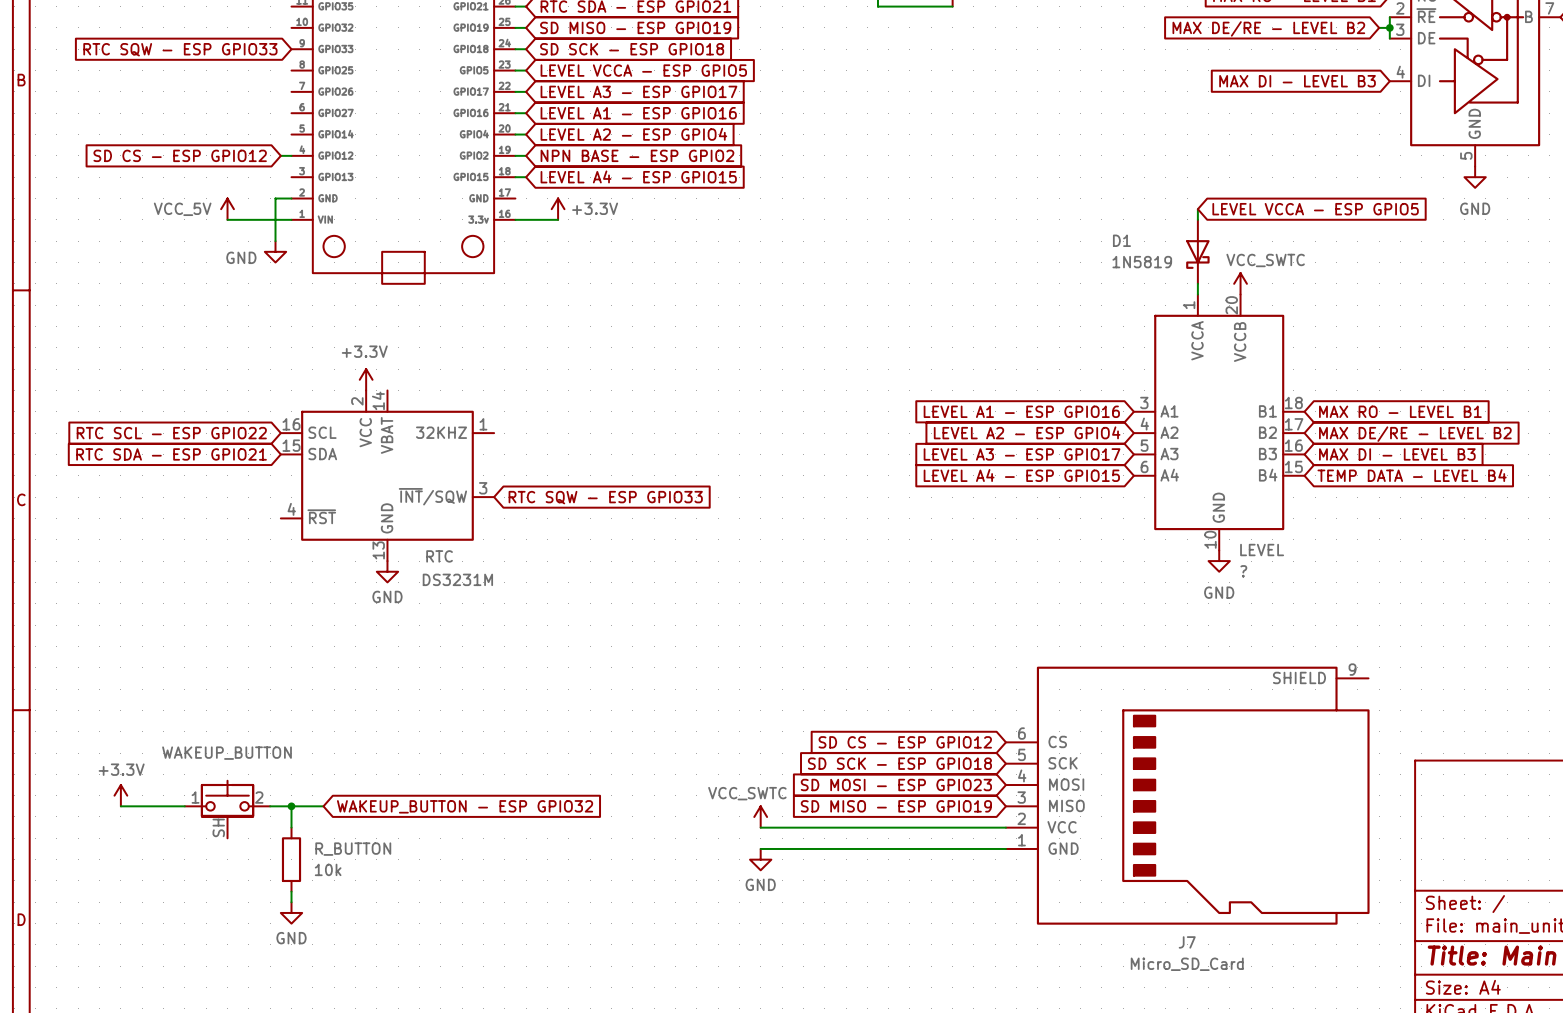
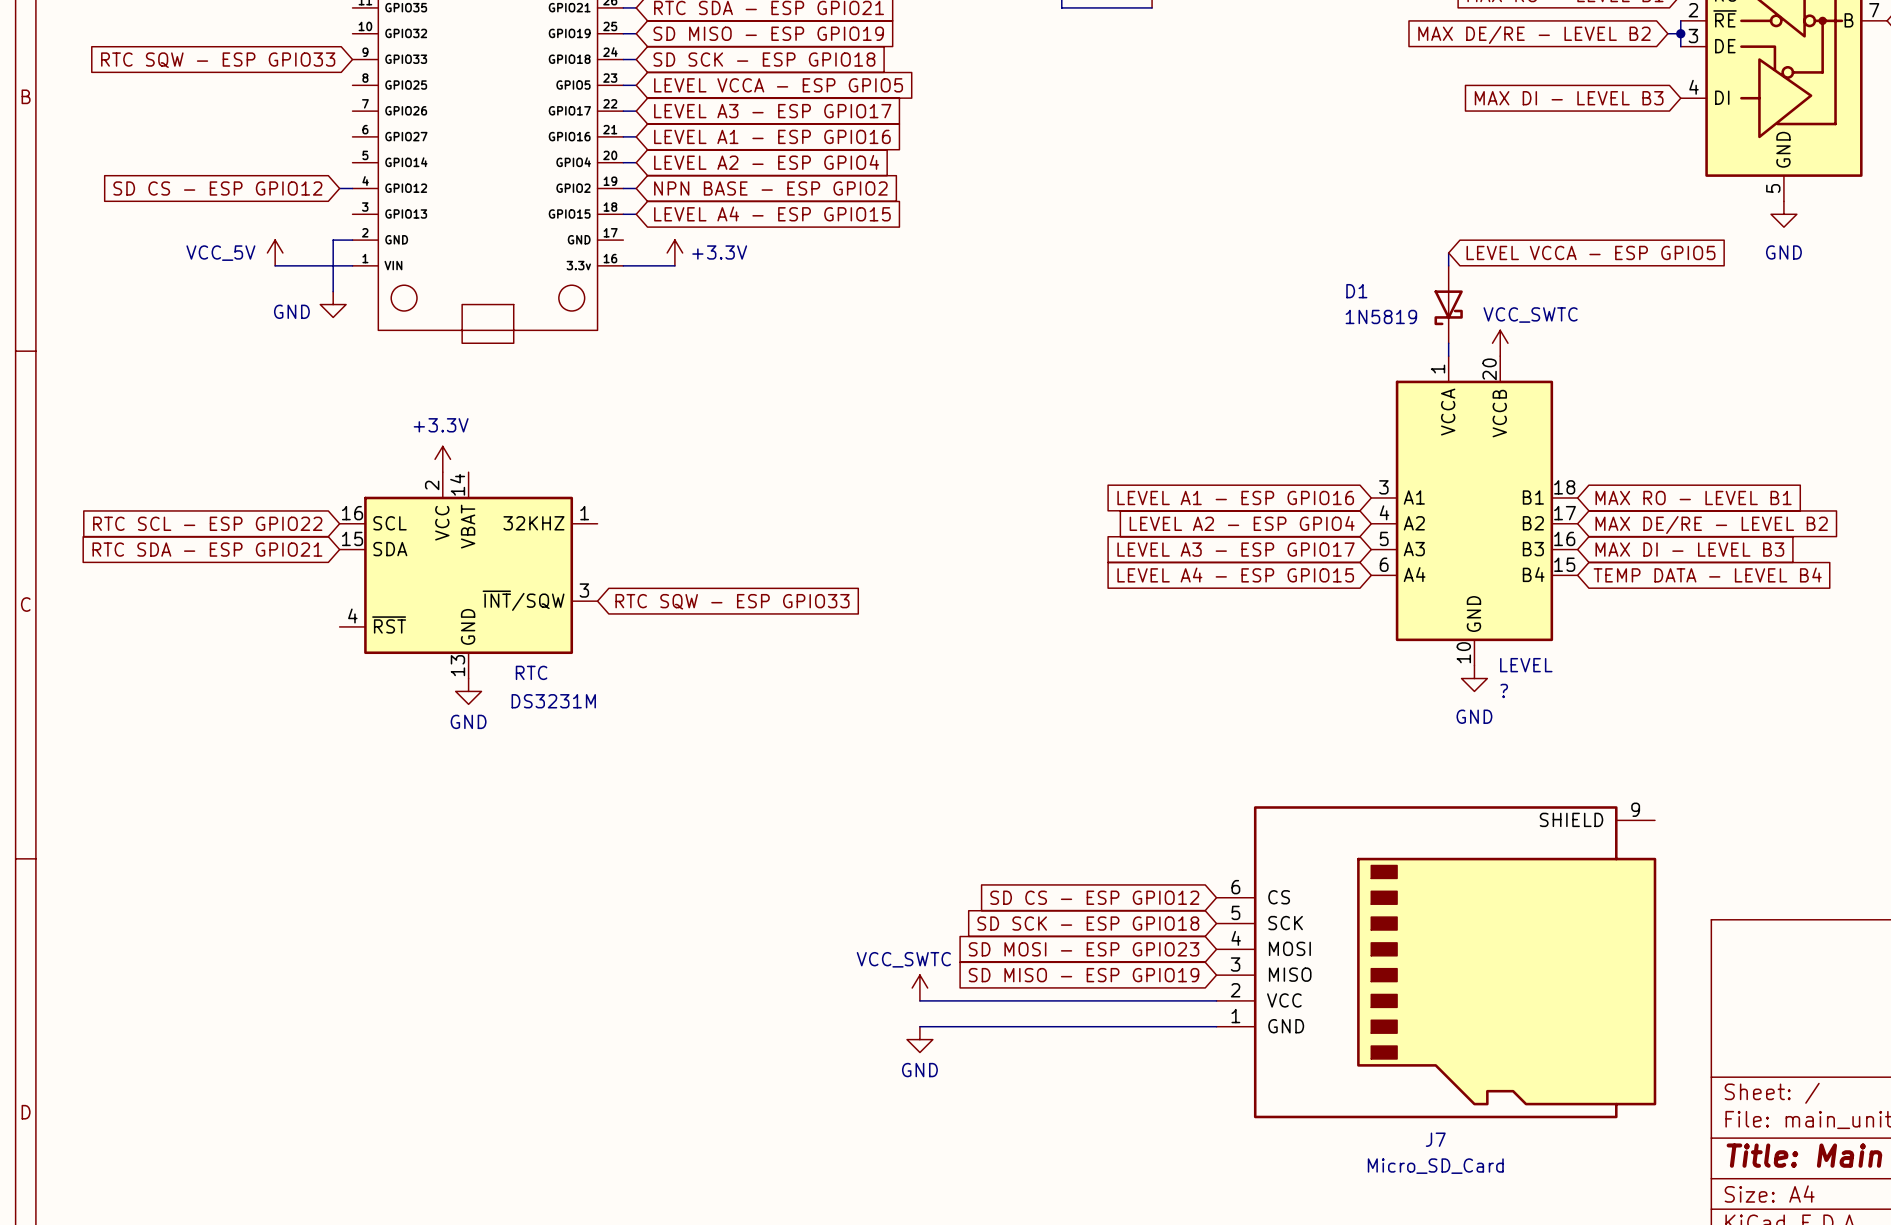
power symbol: +3.3V (120, 795) -> none
wire: (120, 806) (184, 806) -> none
wire: (270, 806) (323, 806) -> none
wire: (291, 806) (291, 827) -> none
junction: (291, 806) -> none
global label: WAKEUP_BUTTON - ESP GPIO32 (465, 806) -> none
WAKEUP_BUTTON: (227, 809) -> none
R_BUTTON: 10k (291, 859) -> none
wire: (291, 891) (291, 902) -> none
power symbol: GND (291, 912) -> none

